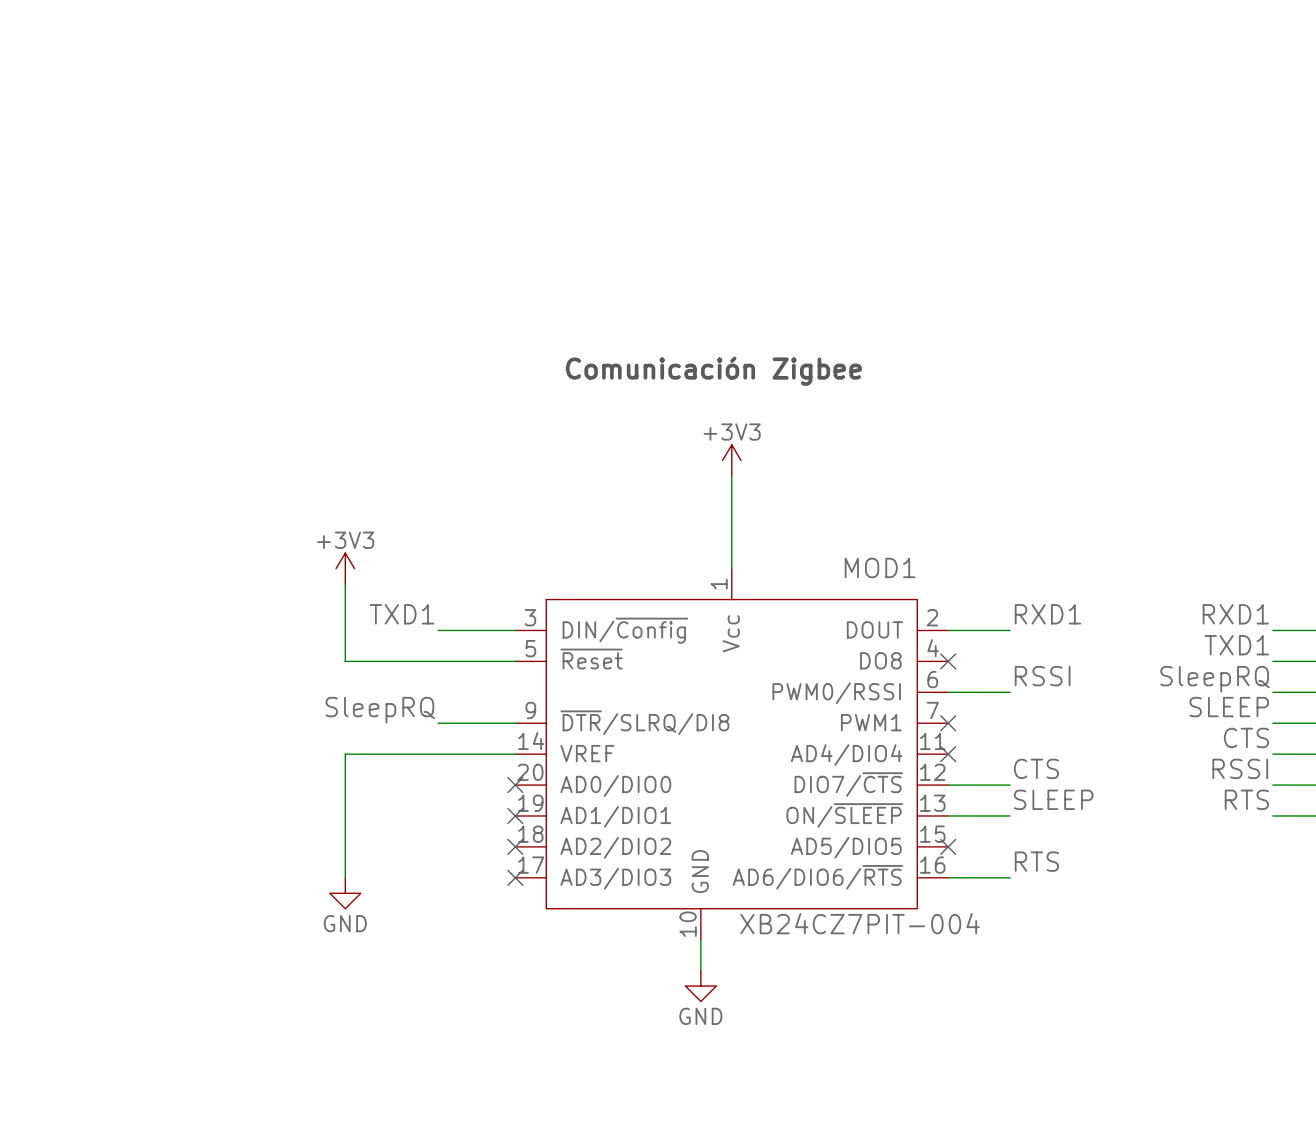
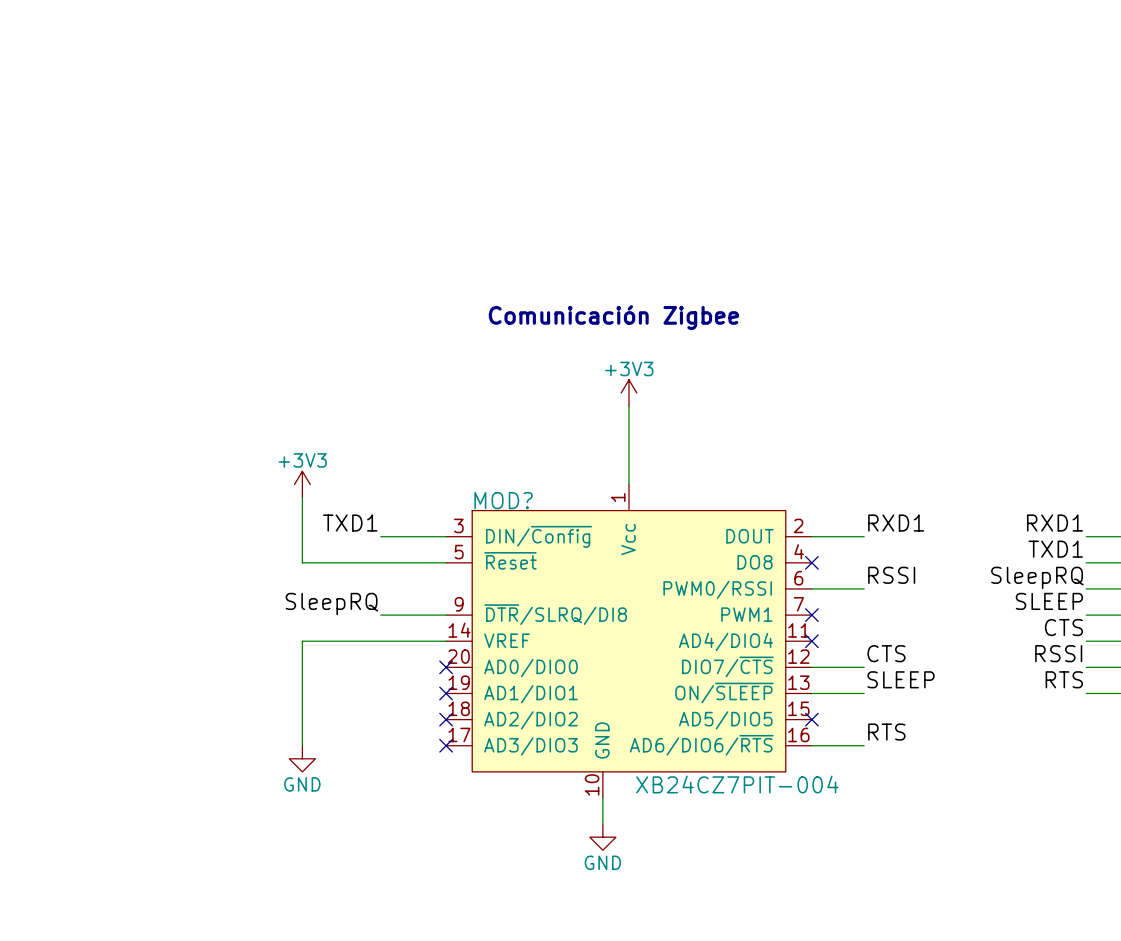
MOD1 name: MOD1 (880, 567) -> MOD? (503, 500)

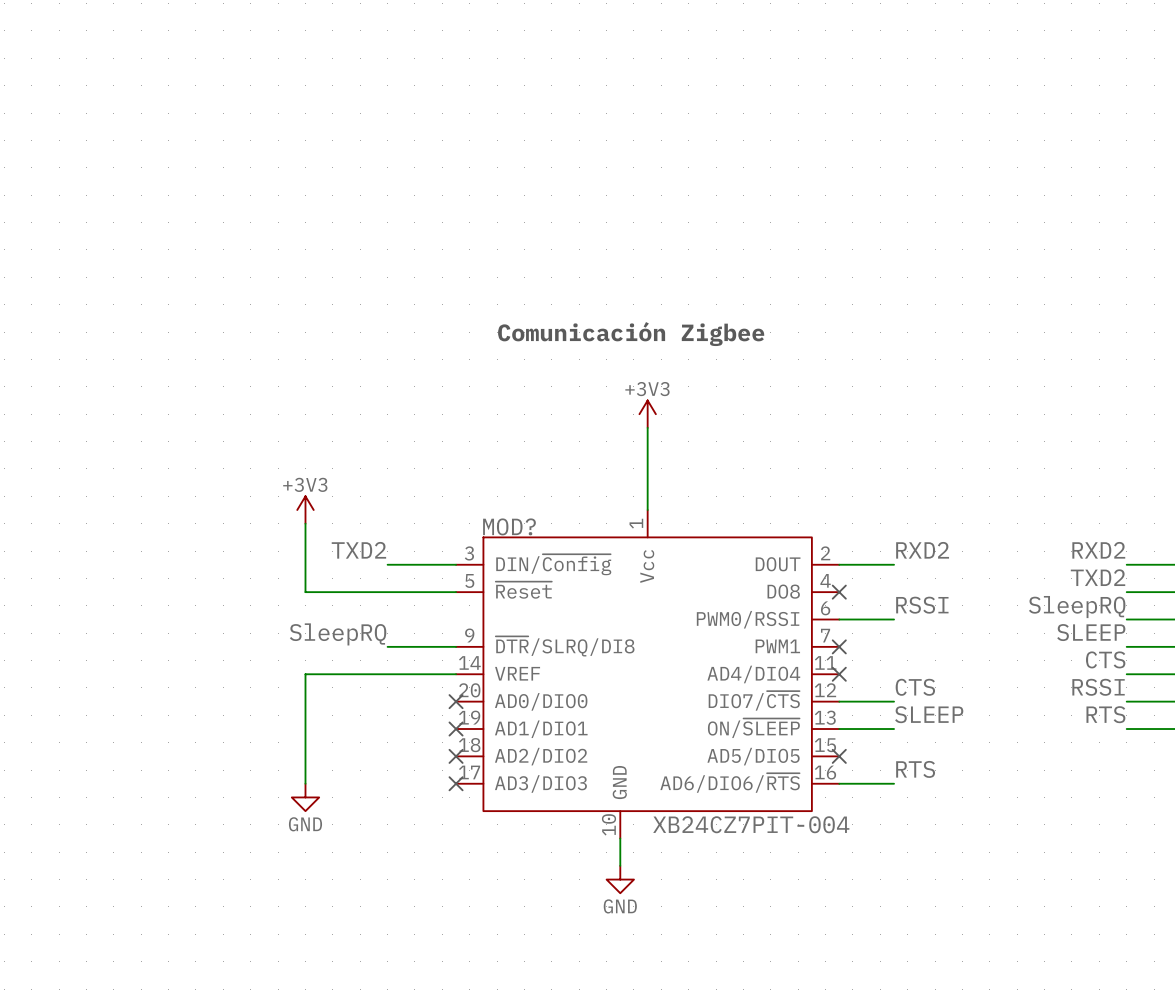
label: TXD1 (350, 523) -> TXD2 (358, 550)
label: RXD1 (896, 523) -> RXD2 (922, 550)
label: RXD1 (1054, 523) -> RXD2 (1098, 550)
label: TXD1 (1055, 549) -> TXD2 (1098, 577)

